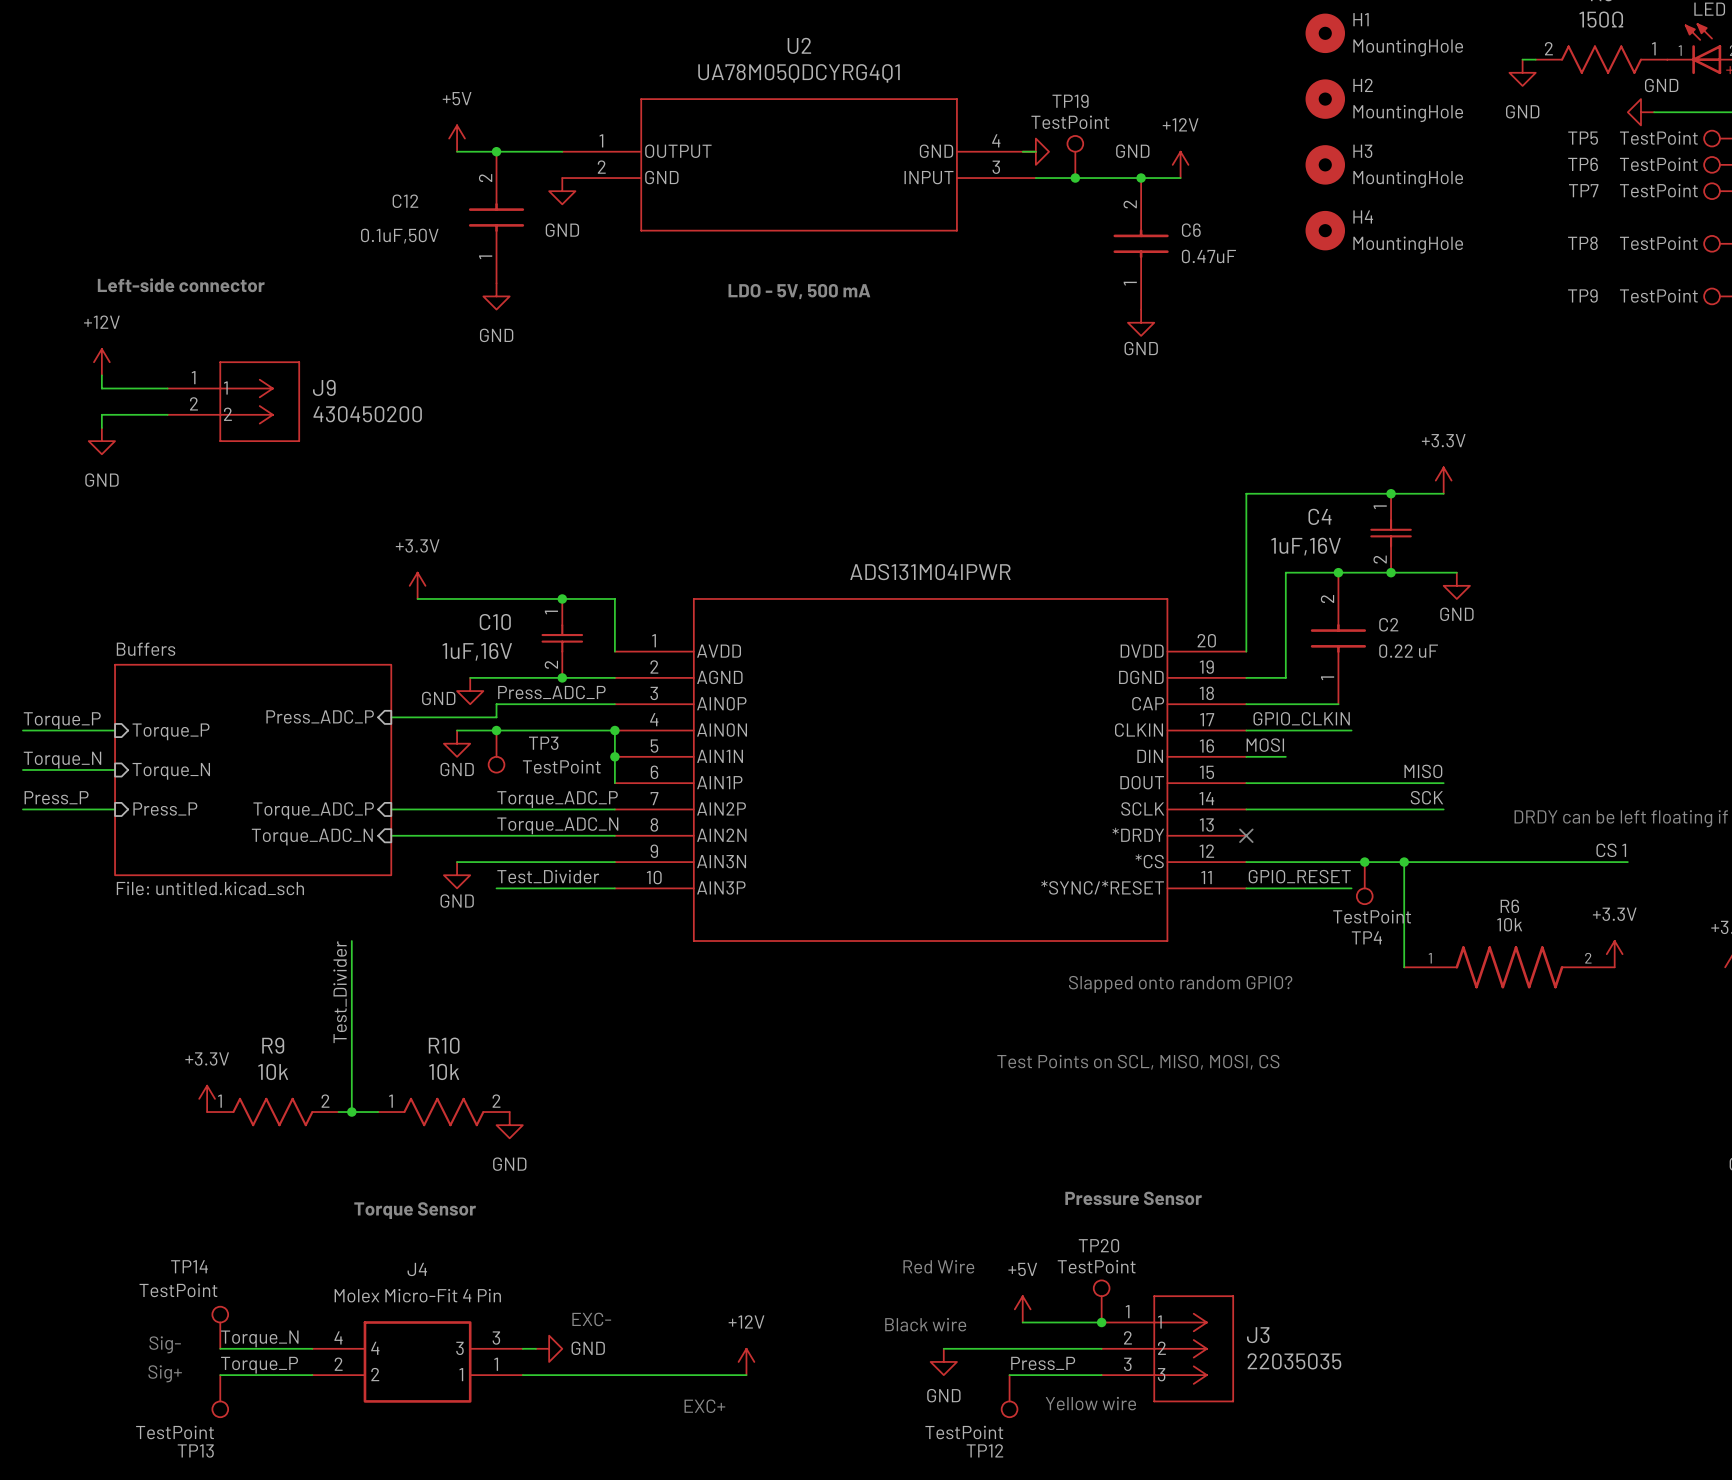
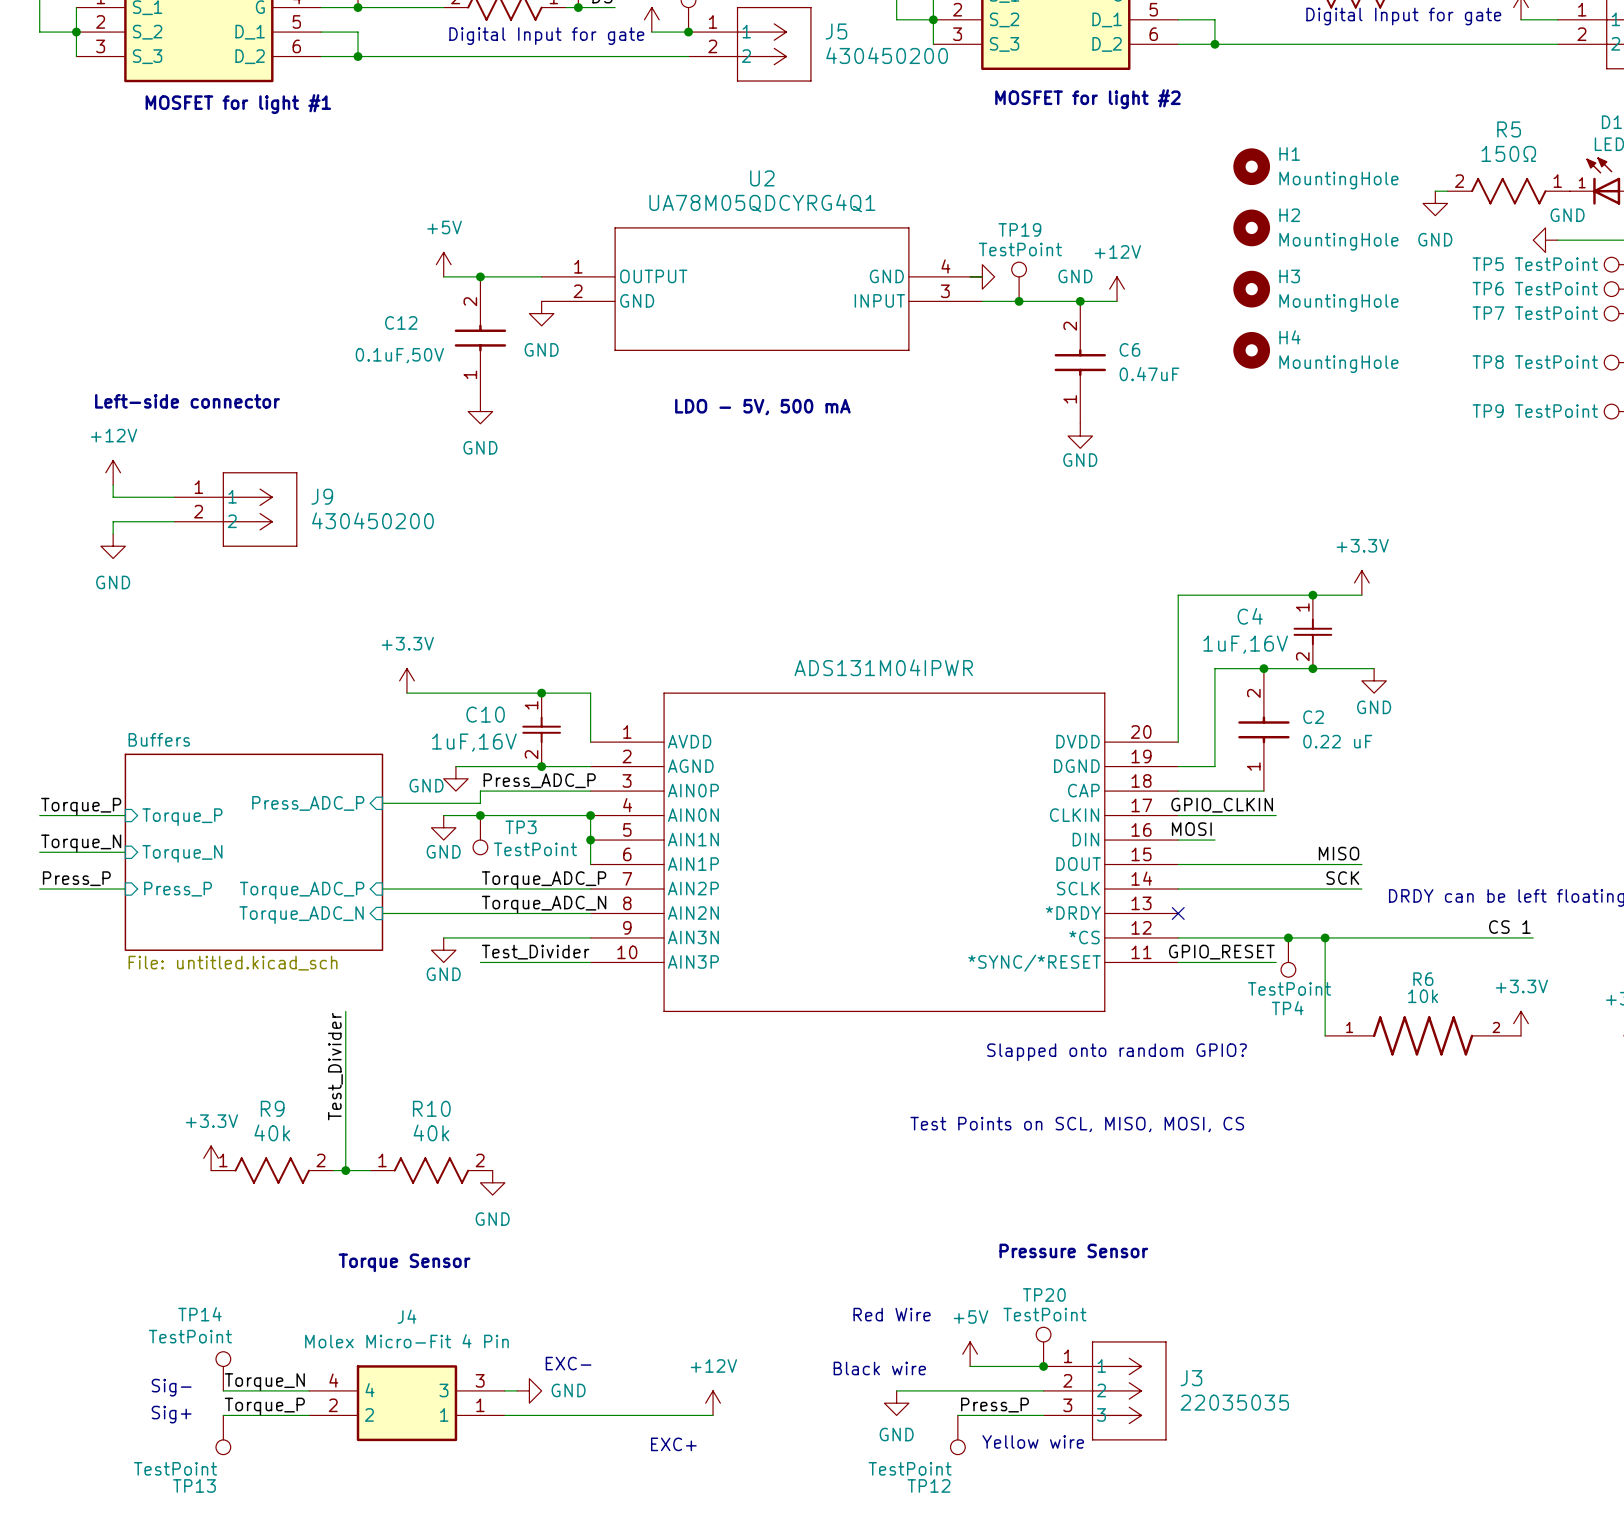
R9 value: 10k (273, 1071) -> 40k (272, 1132)
R10 value: 10k (444, 1071) -> 40k (431, 1132)

